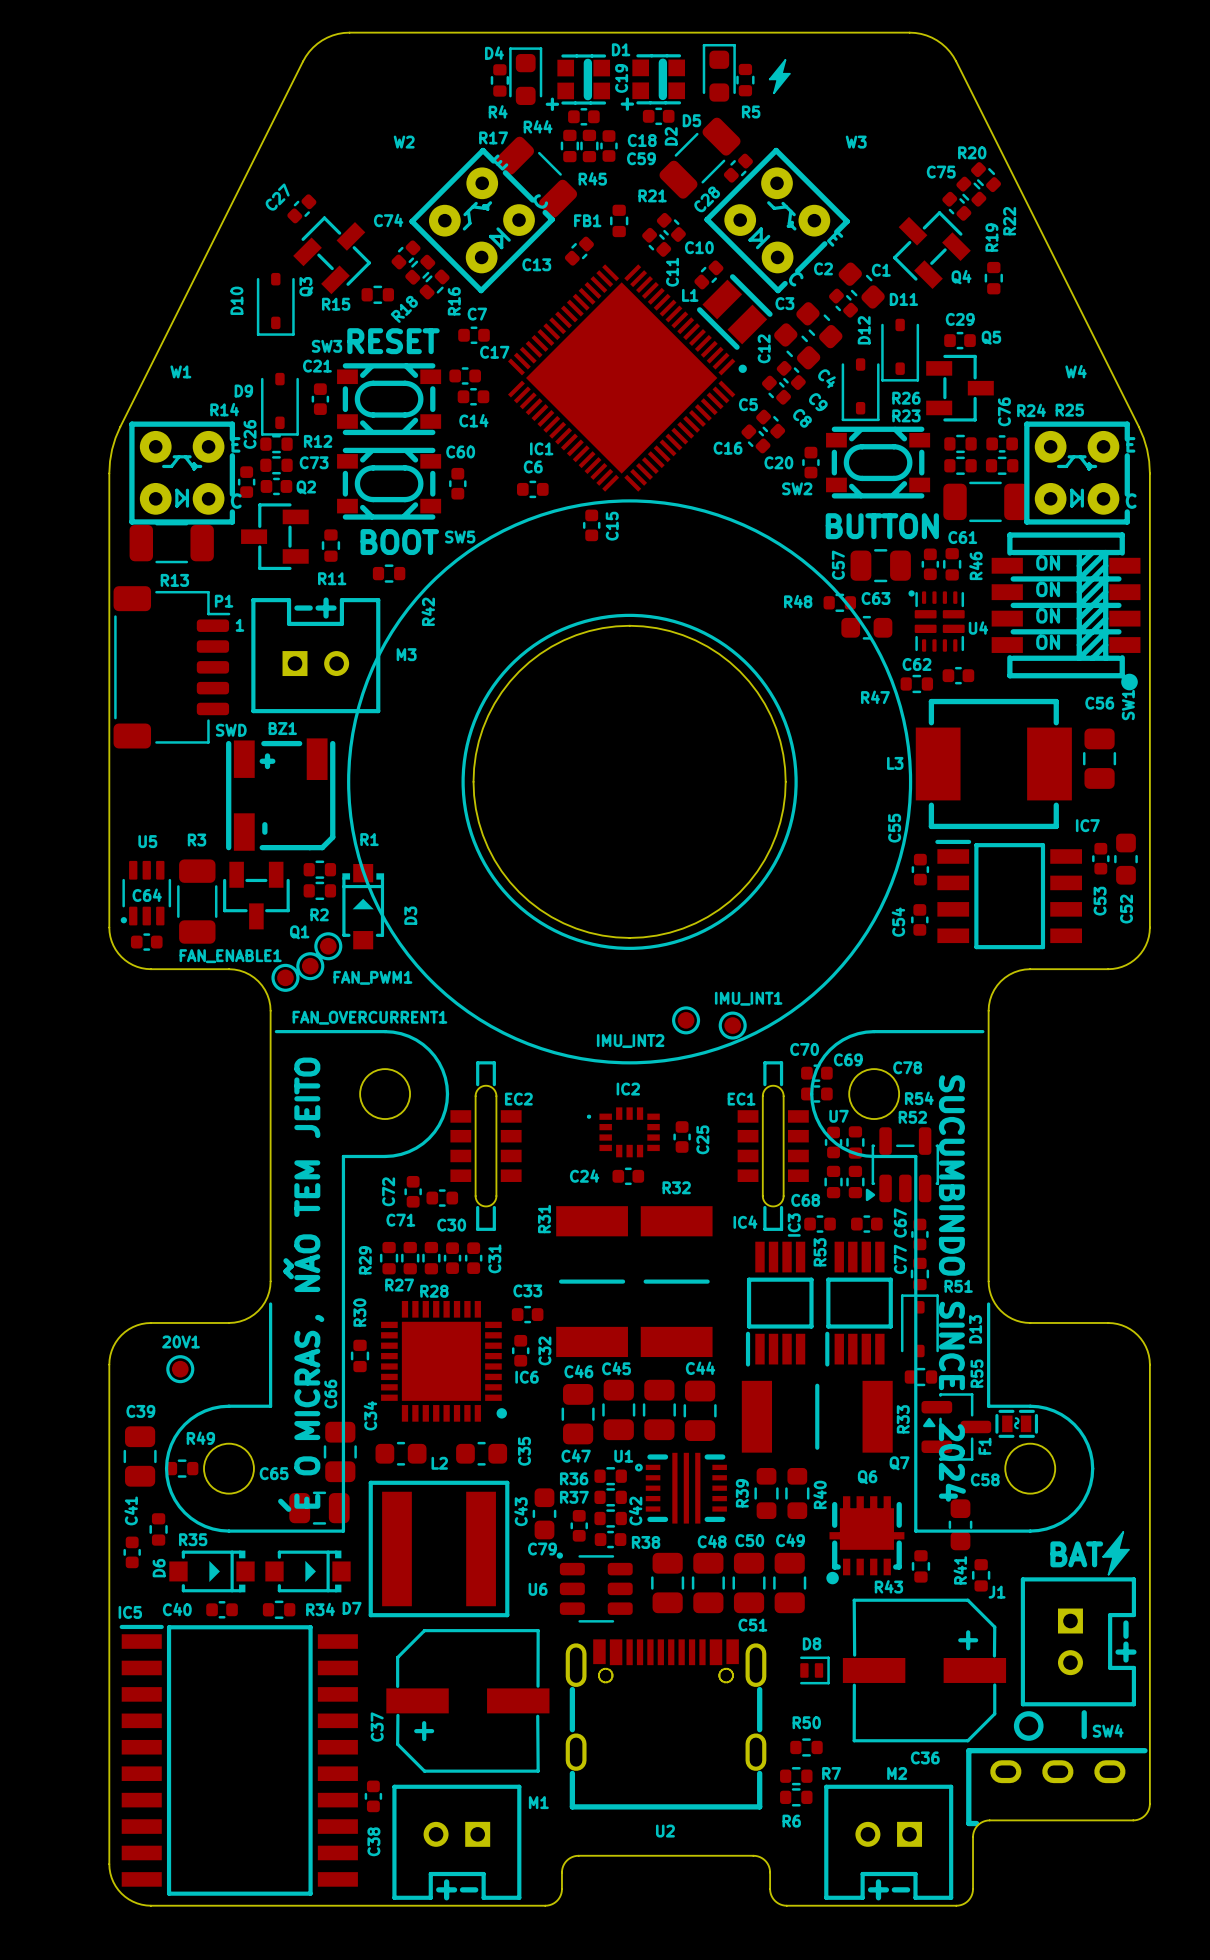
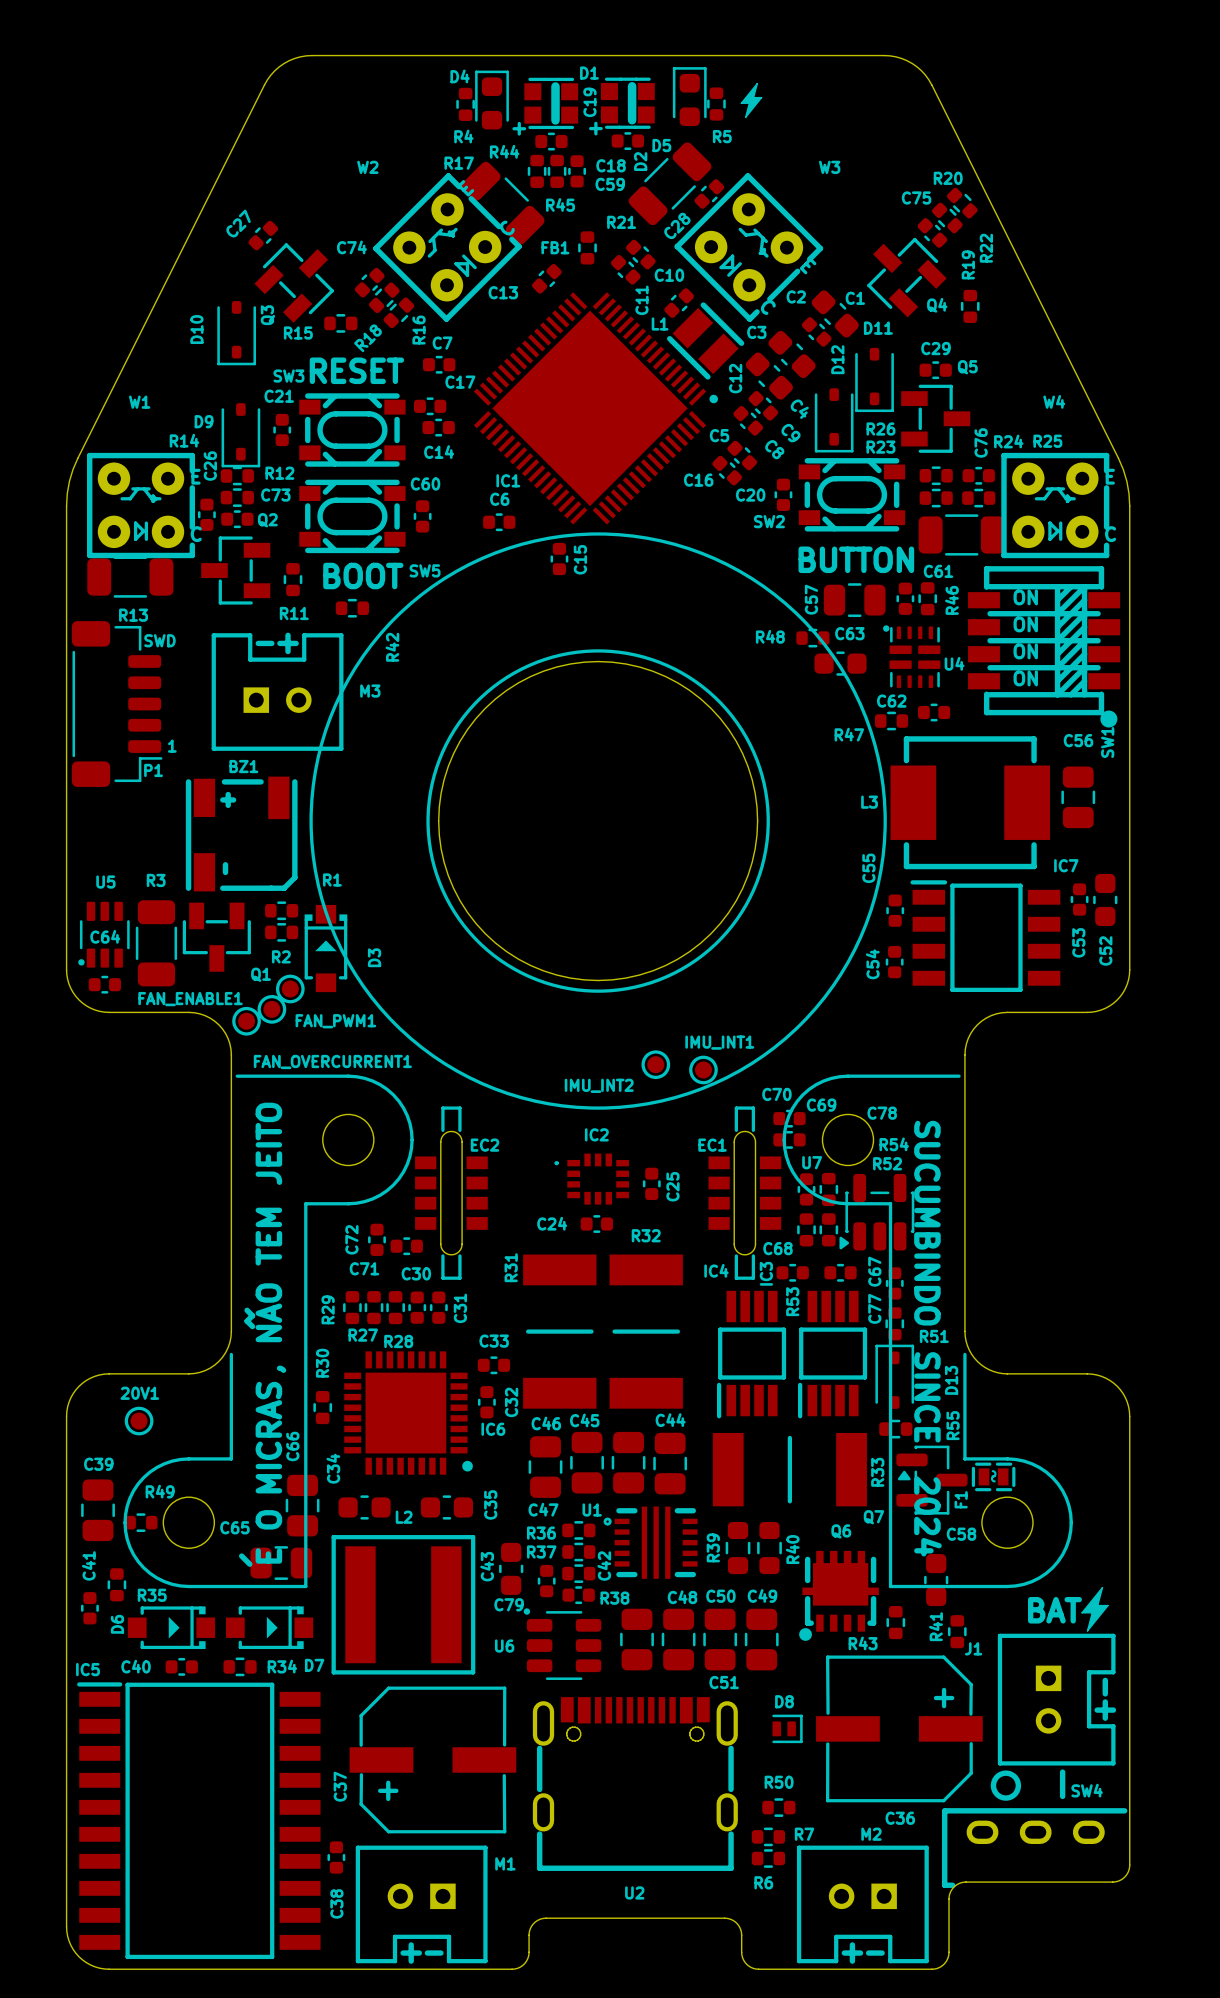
P1 footprint: [113, 586, 231, 749] -> [71, 621, 163, 787]
P1 name position: P1 (224, 601) -> P1 (153, 770)
text position: 1 (239, 625) -> 1 (172, 746)
text position: SWD (231, 730) -> SWD (159, 640)

